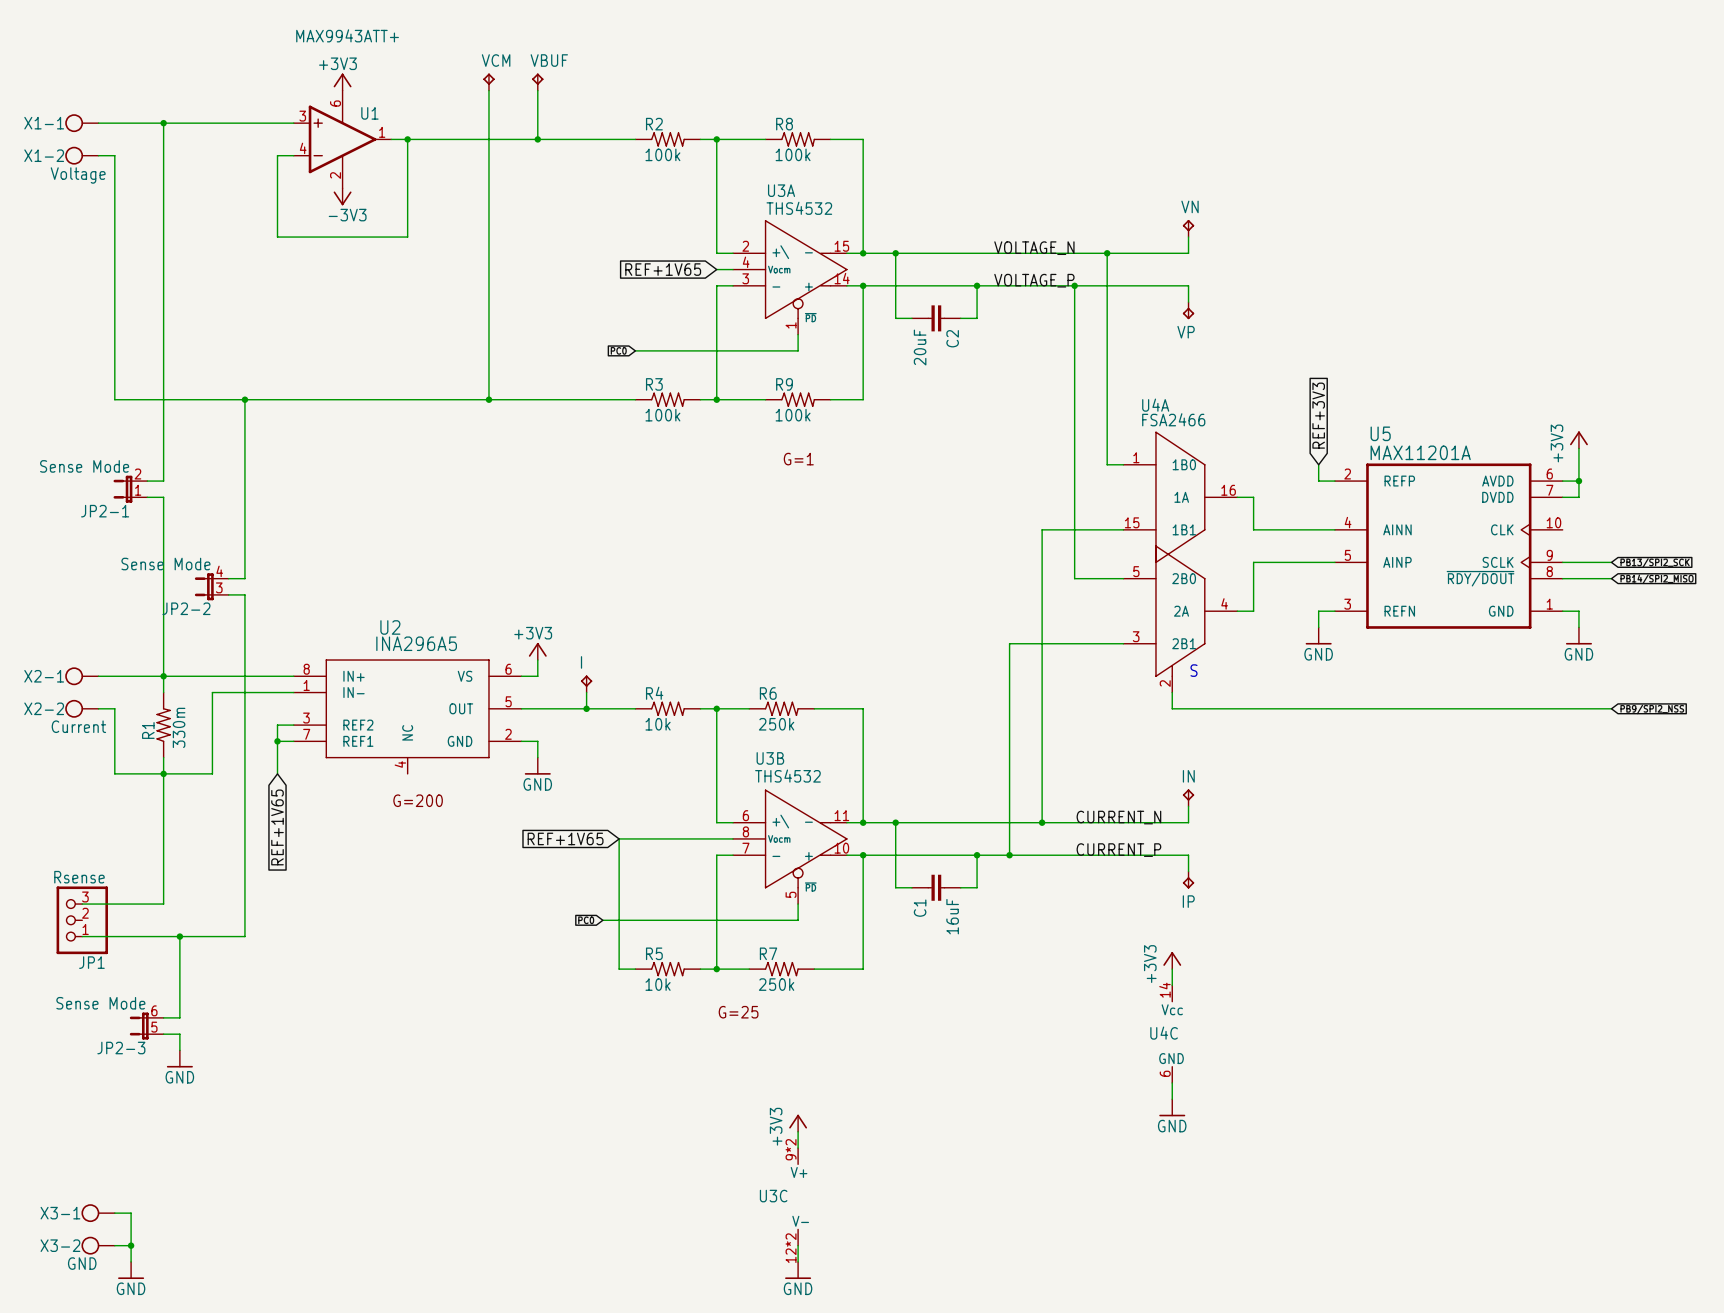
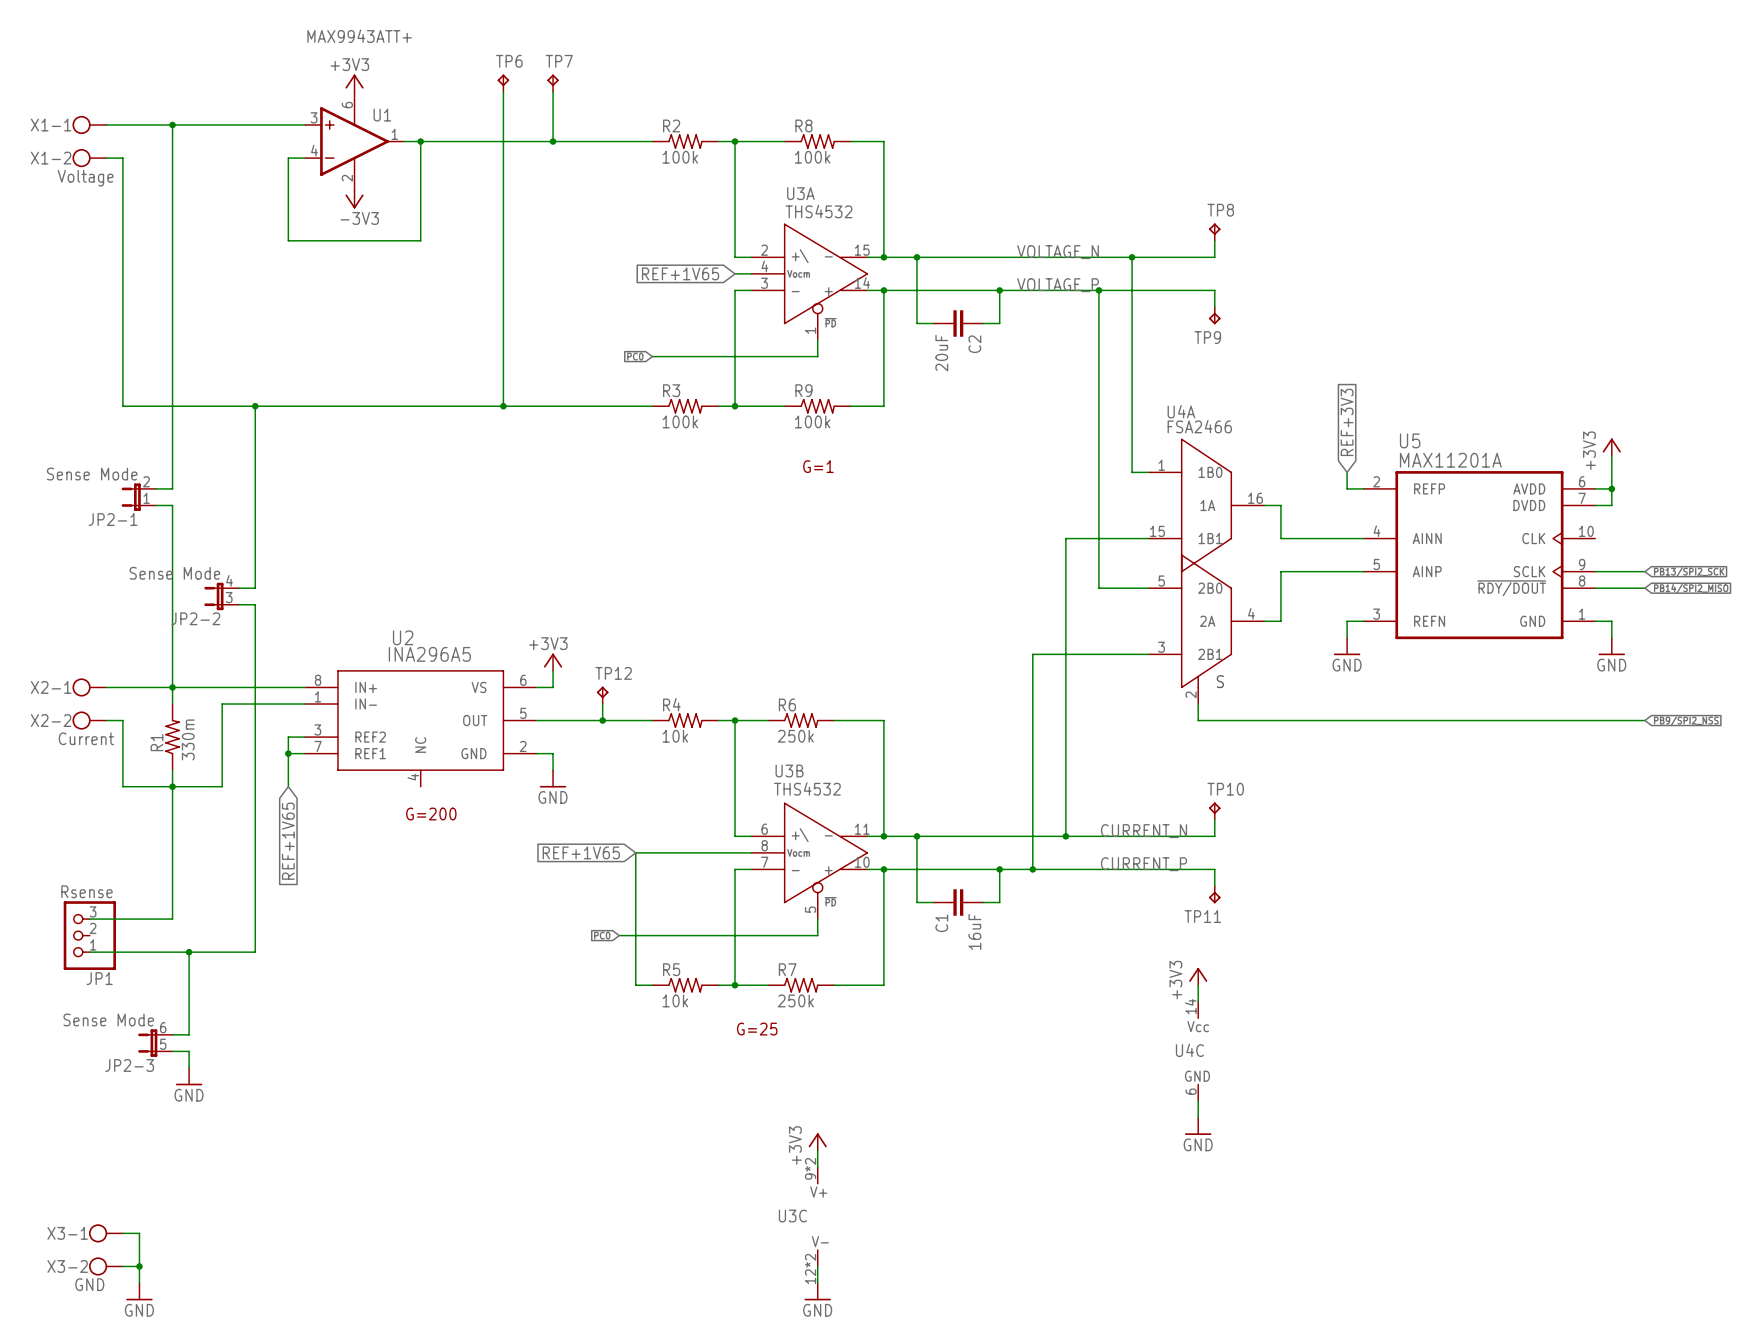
VCM name: VCM (496, 60) -> TP6 (509, 61)
VBUF name: VBUF (549, 60) -> TP7 (559, 61)
VN name: VN (1190, 206) -> TP8 (1220, 210)
VP name: VP (1186, 332) -> TP9 (1207, 337)
I name: I (581, 662) -> TP12 (613, 673)
IN name: IN (1188, 776) -> TP10 (1225, 789)
IP name: IP (1188, 901) -> TP11 (1202, 916)

